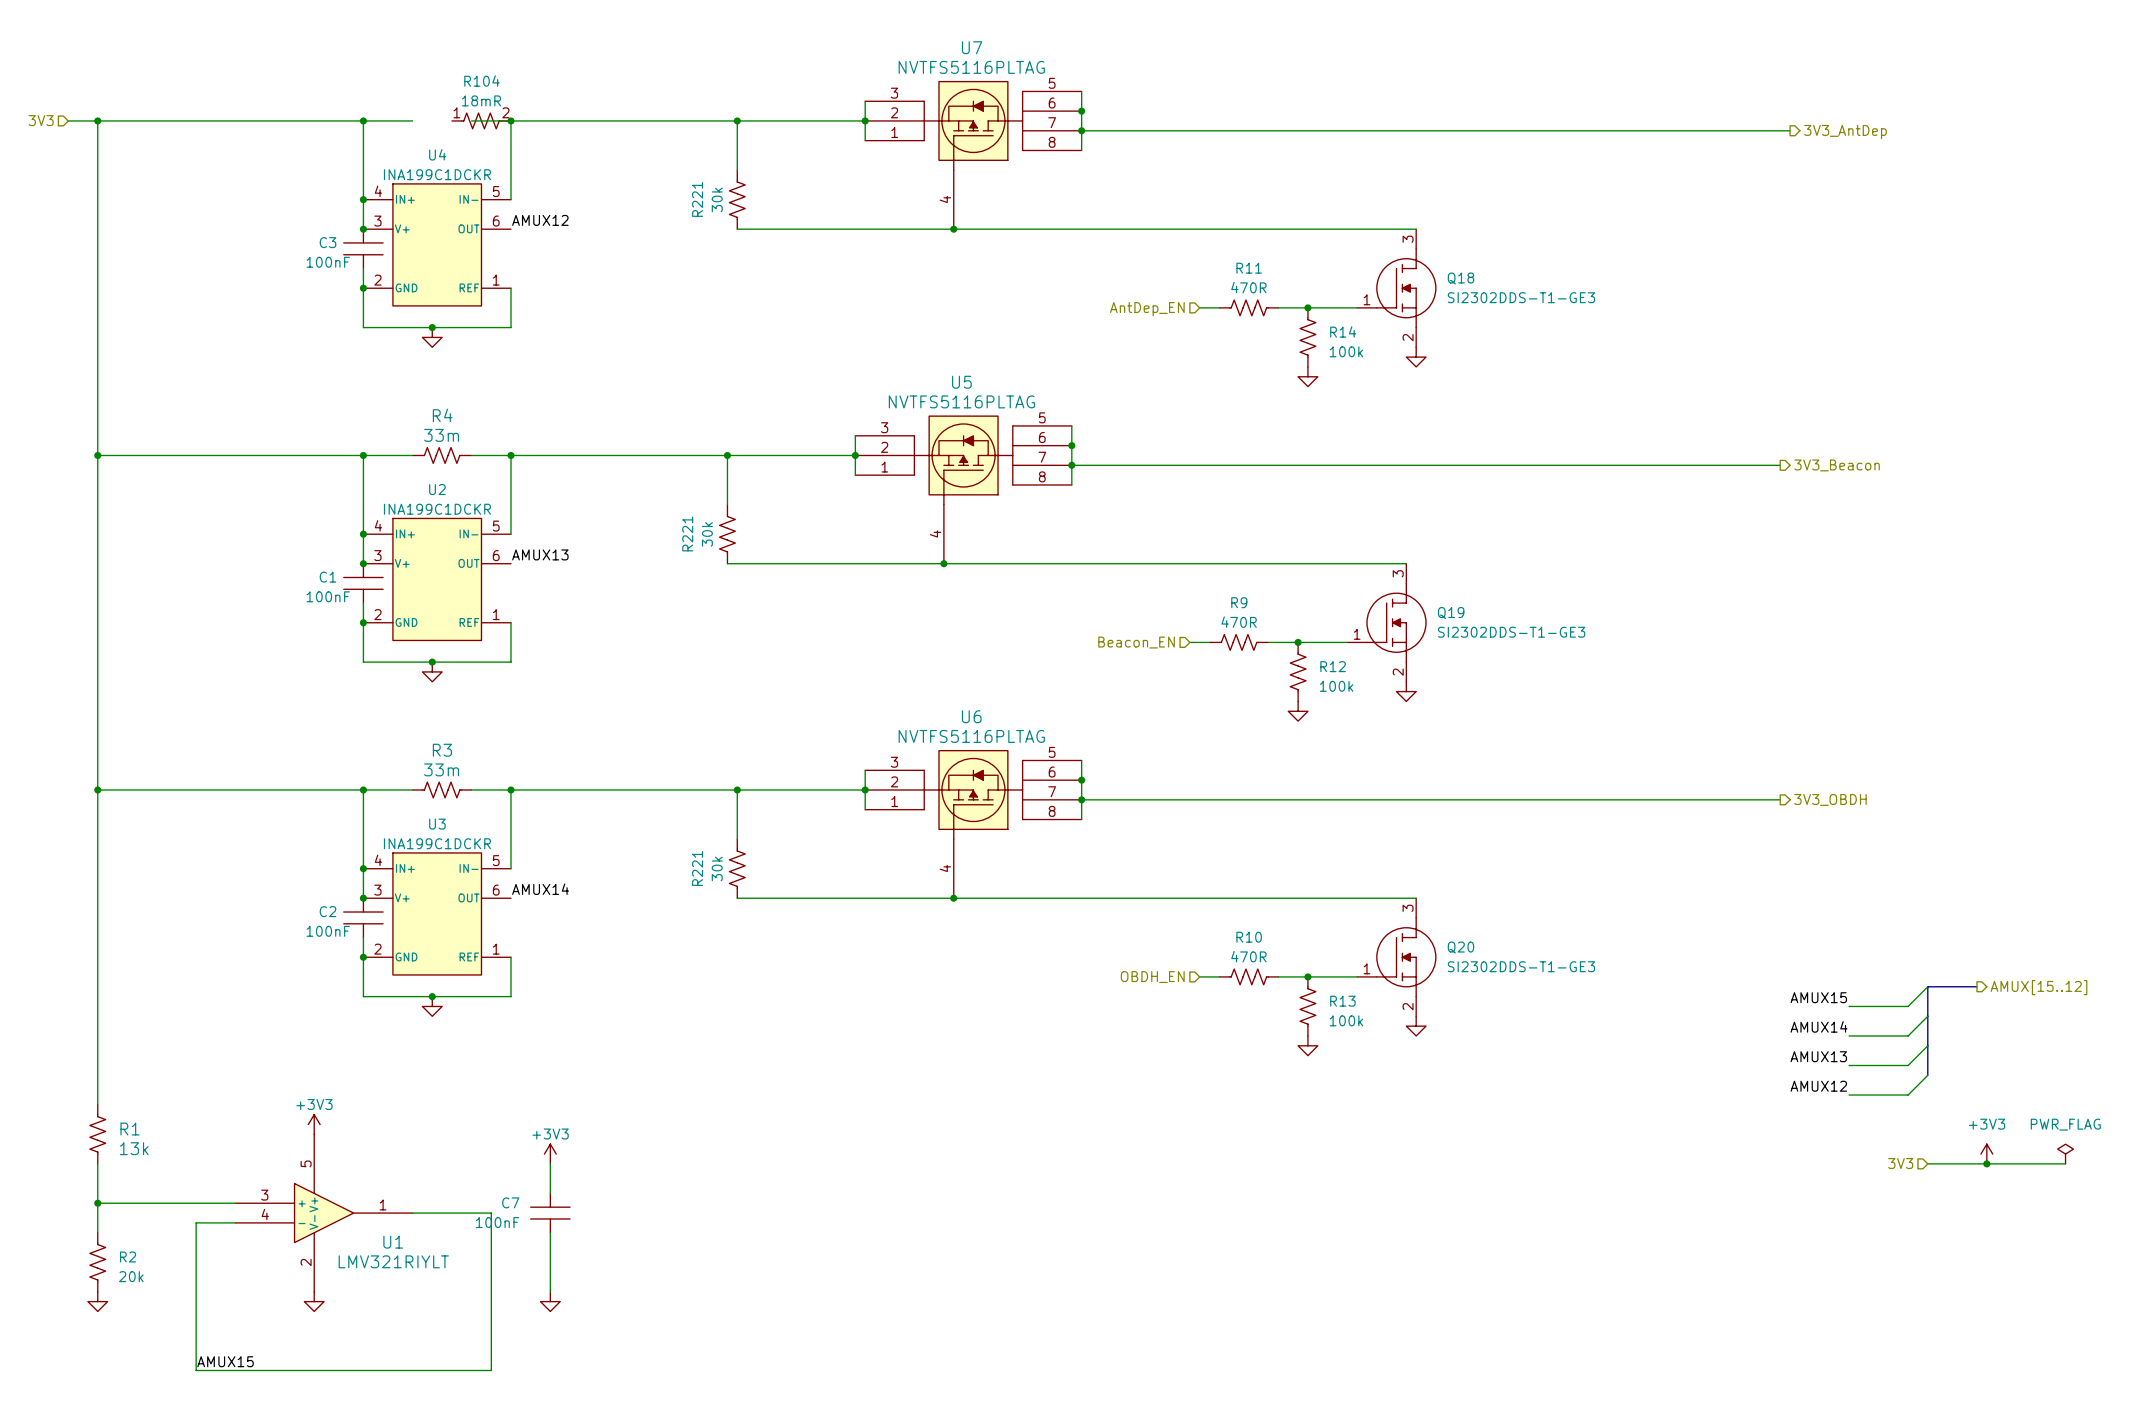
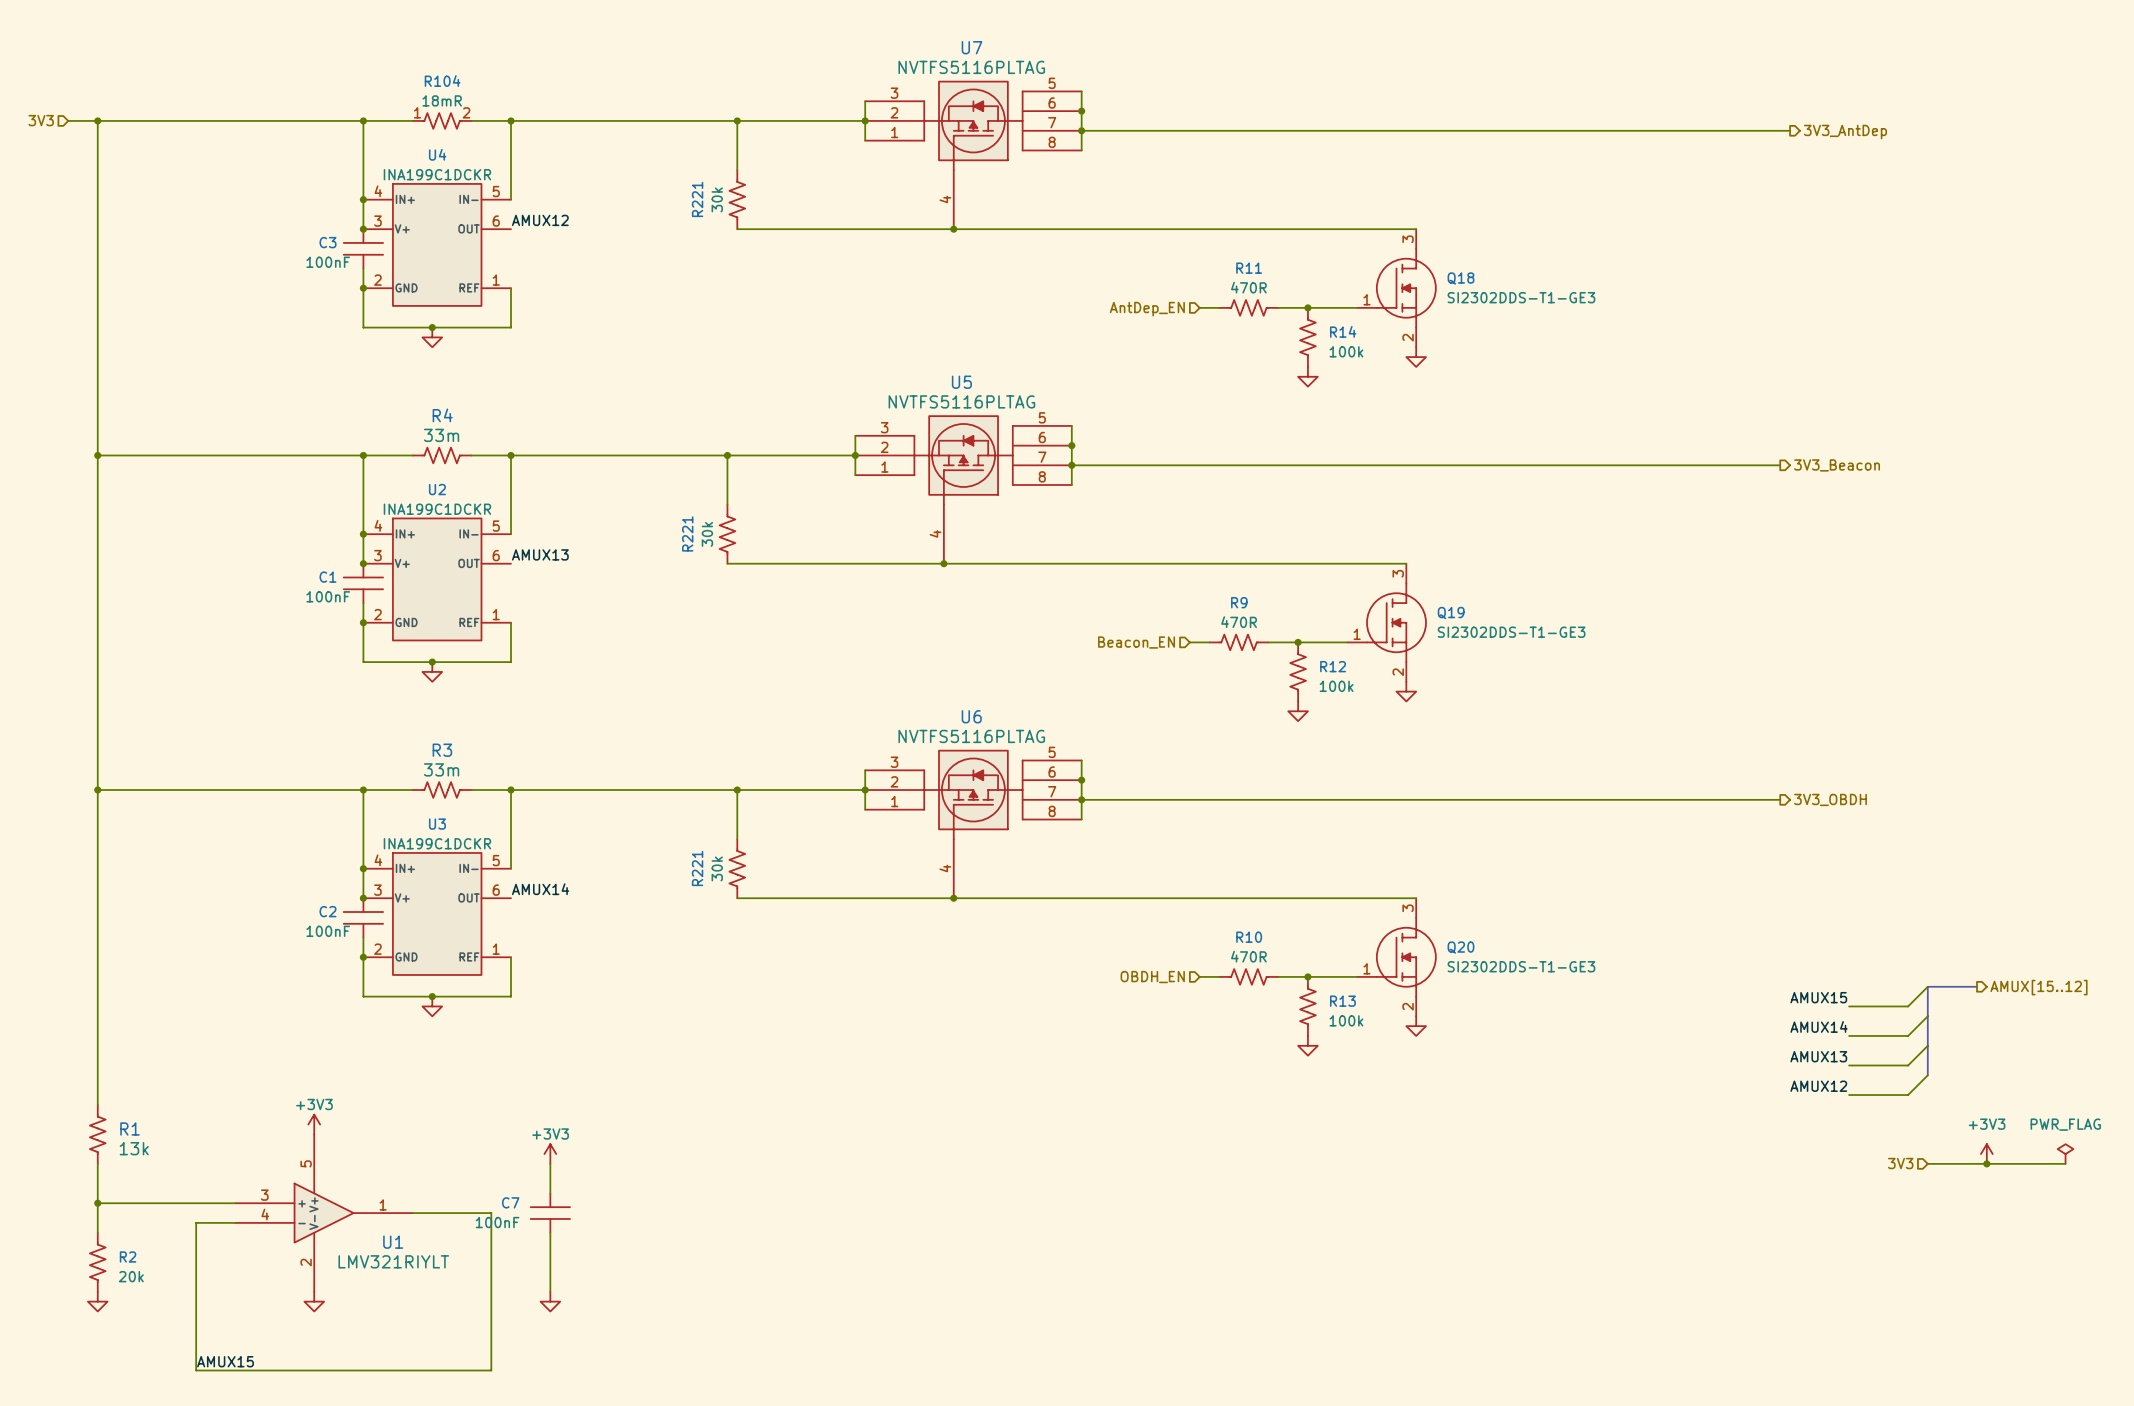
R104 position: (481, 120) -> (442, 120)

